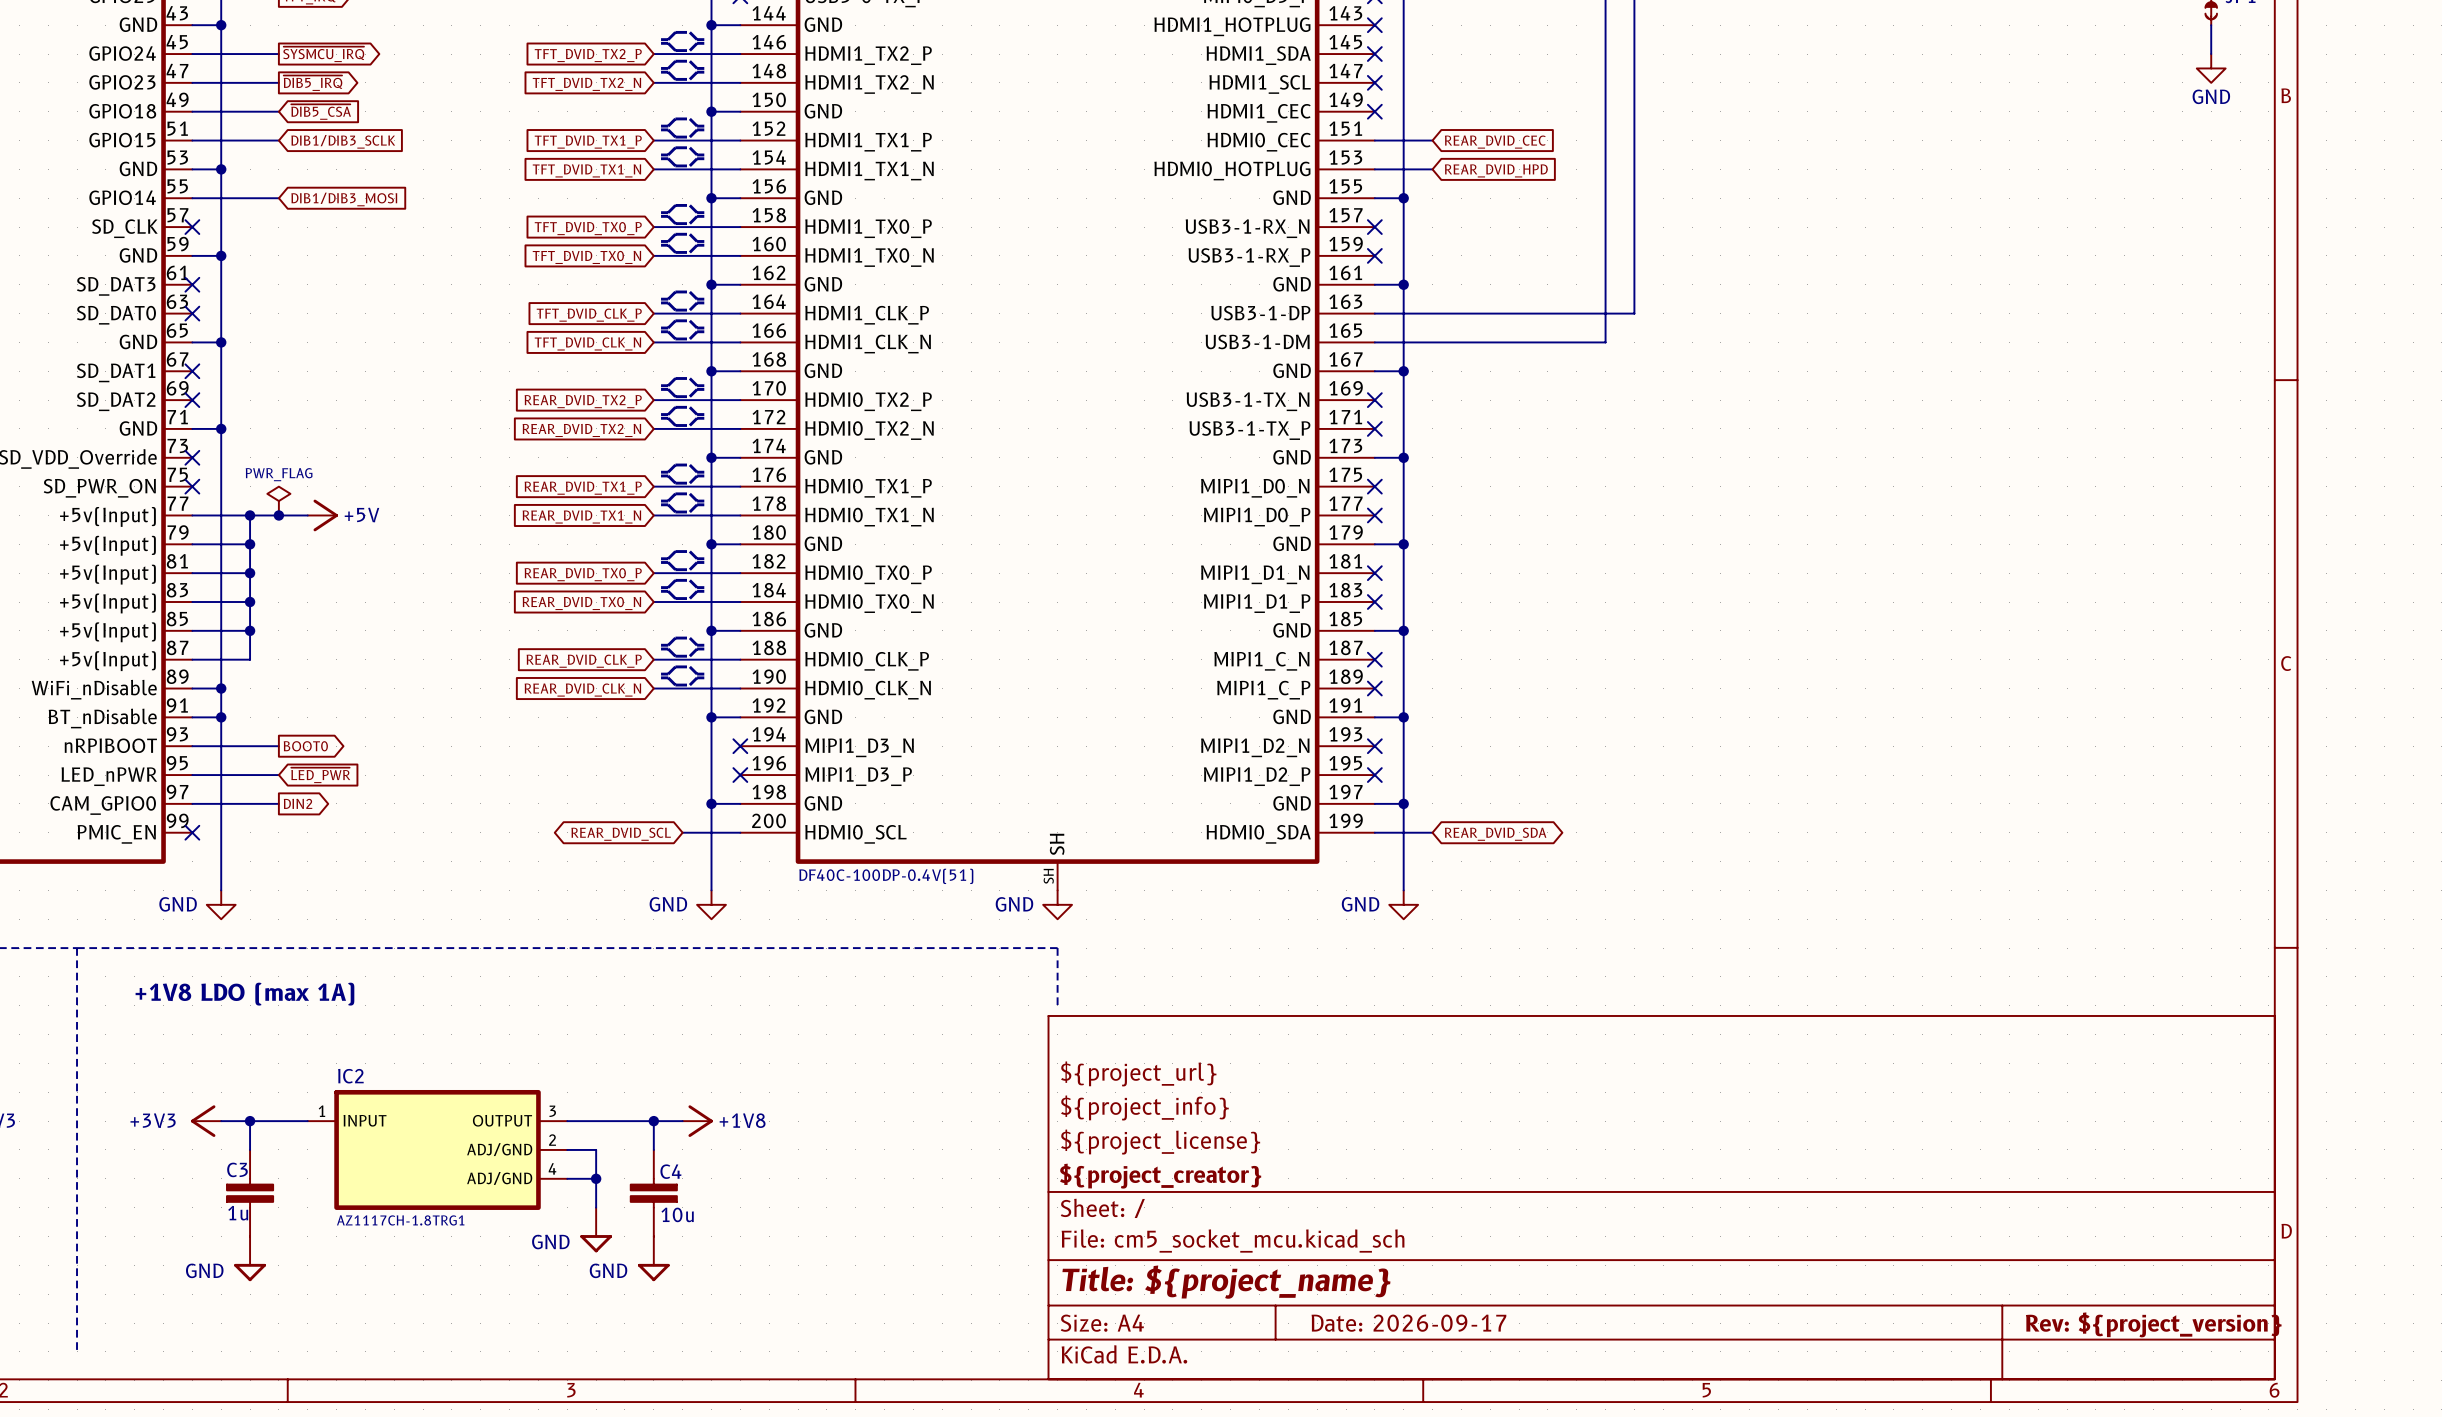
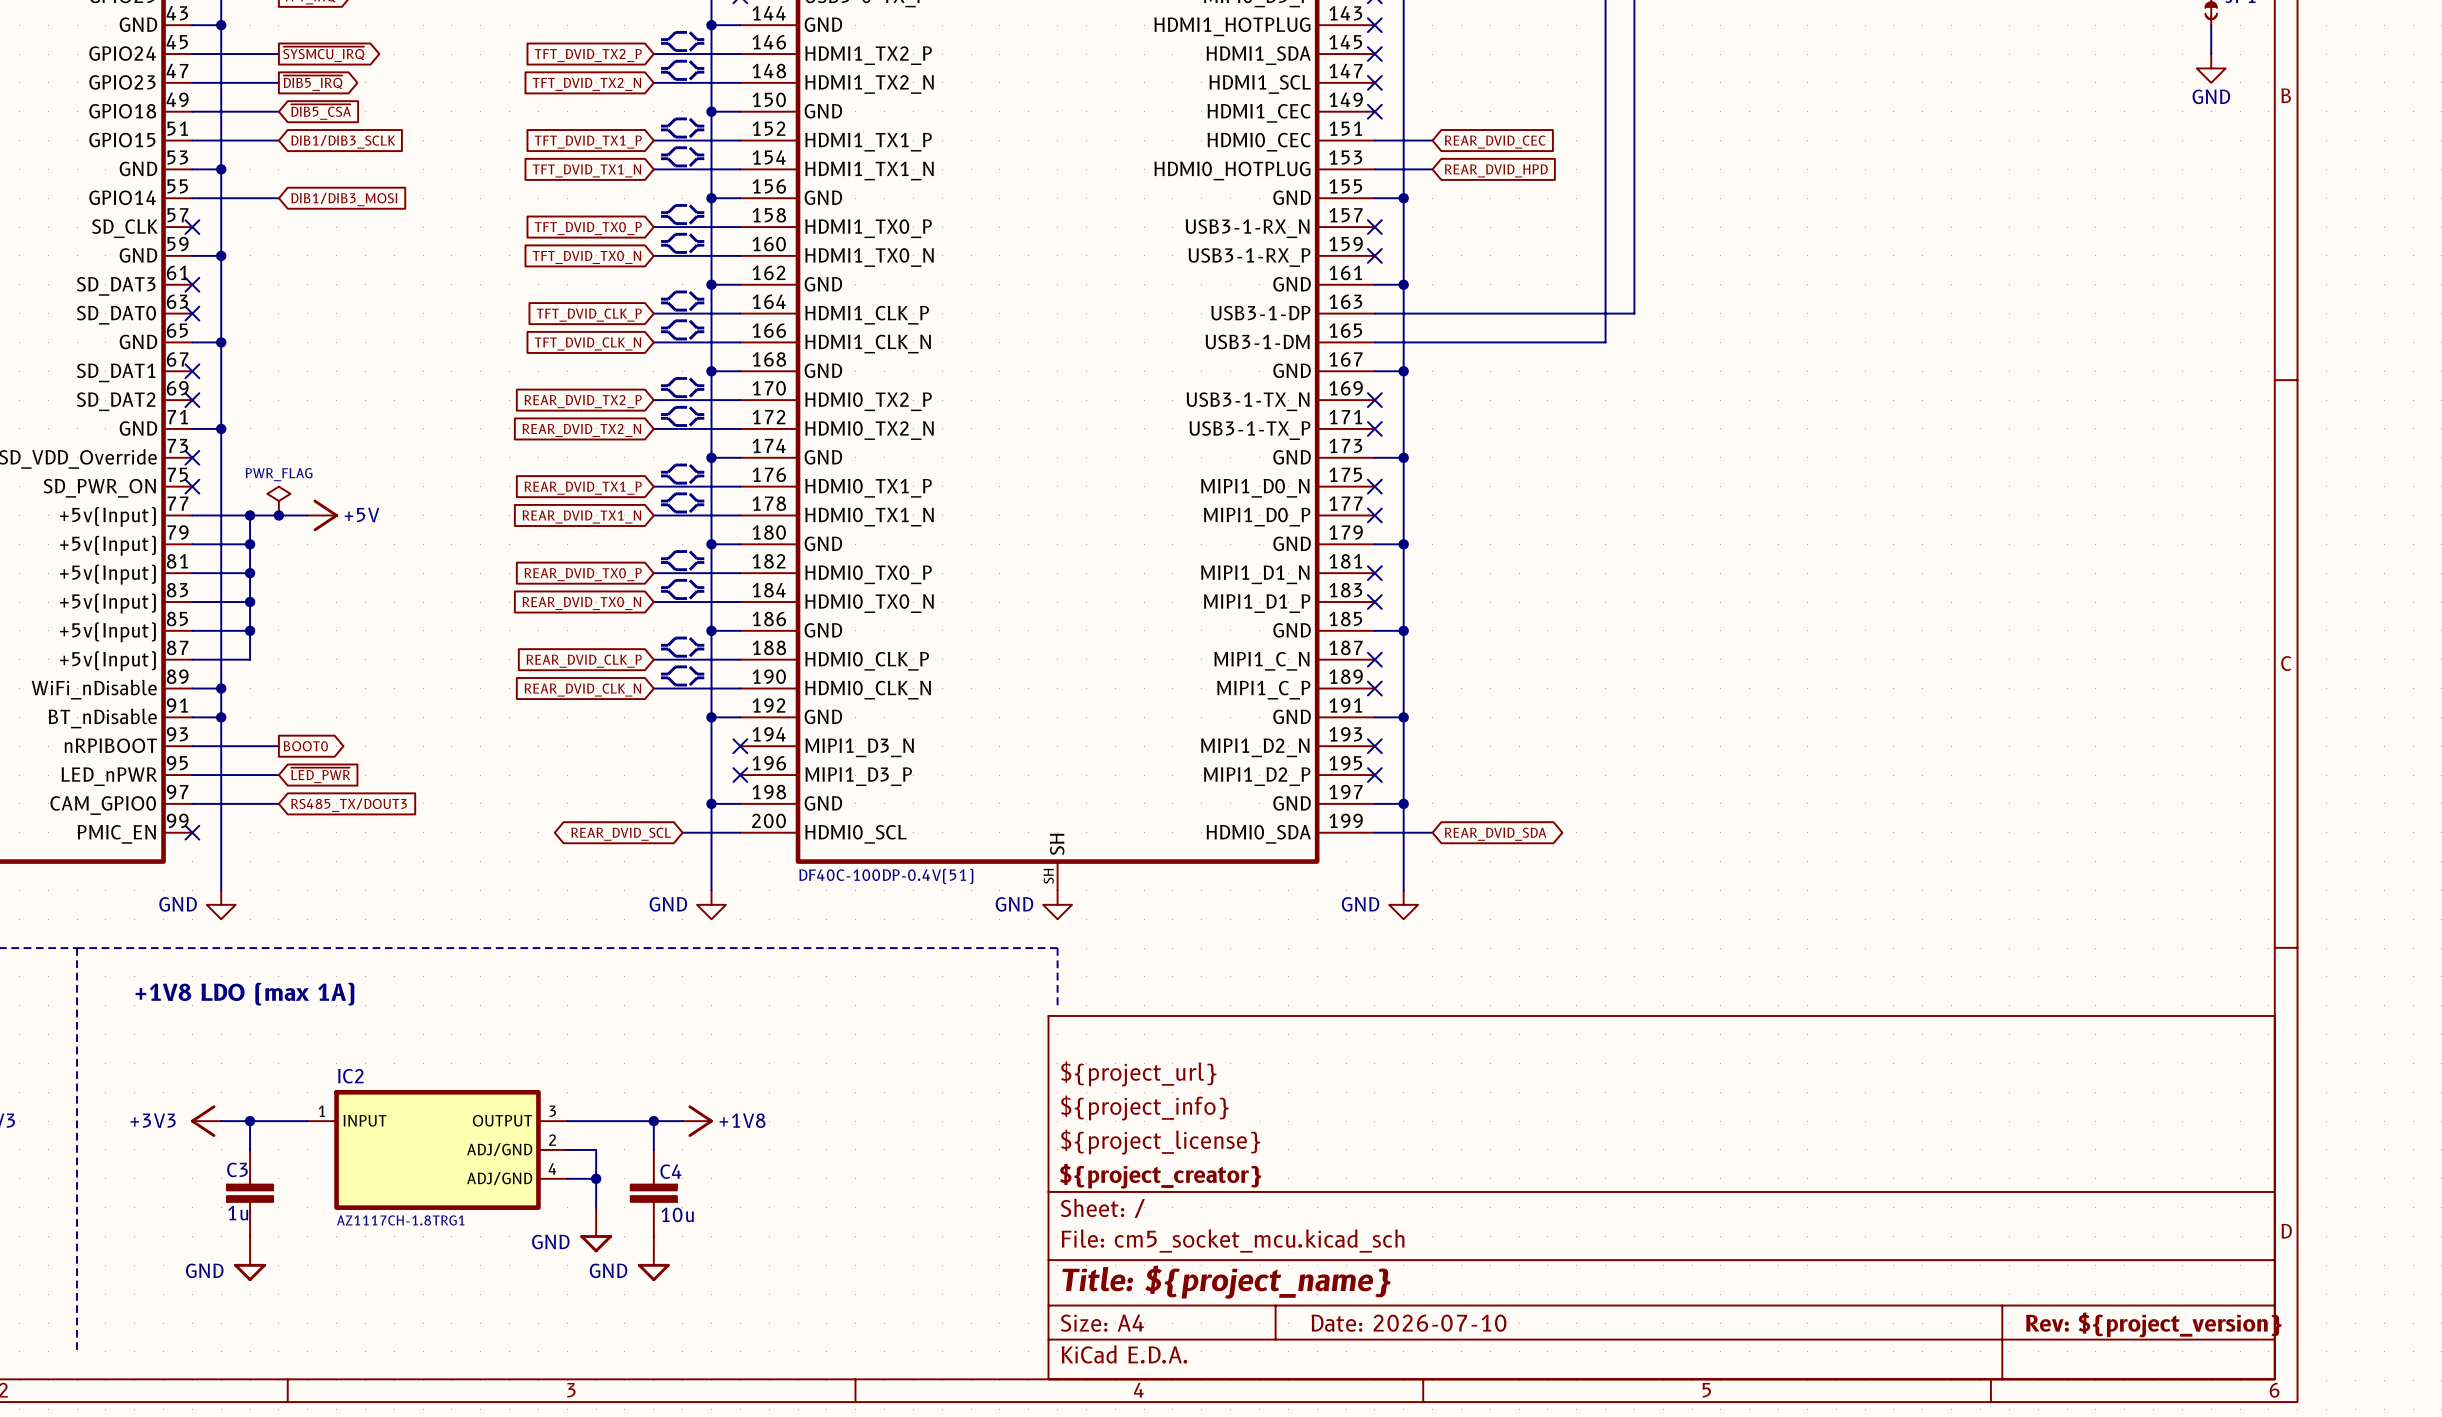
global label shape: output (298, 803) -> input (349, 805)
global label: DIN2 (298, 803) -> RS485_TX/DOUT3 (349, 805)
title block: Date: 2026-09-17 (1408, 1323) -> Date: 2026-07-10 (1409, 1323)

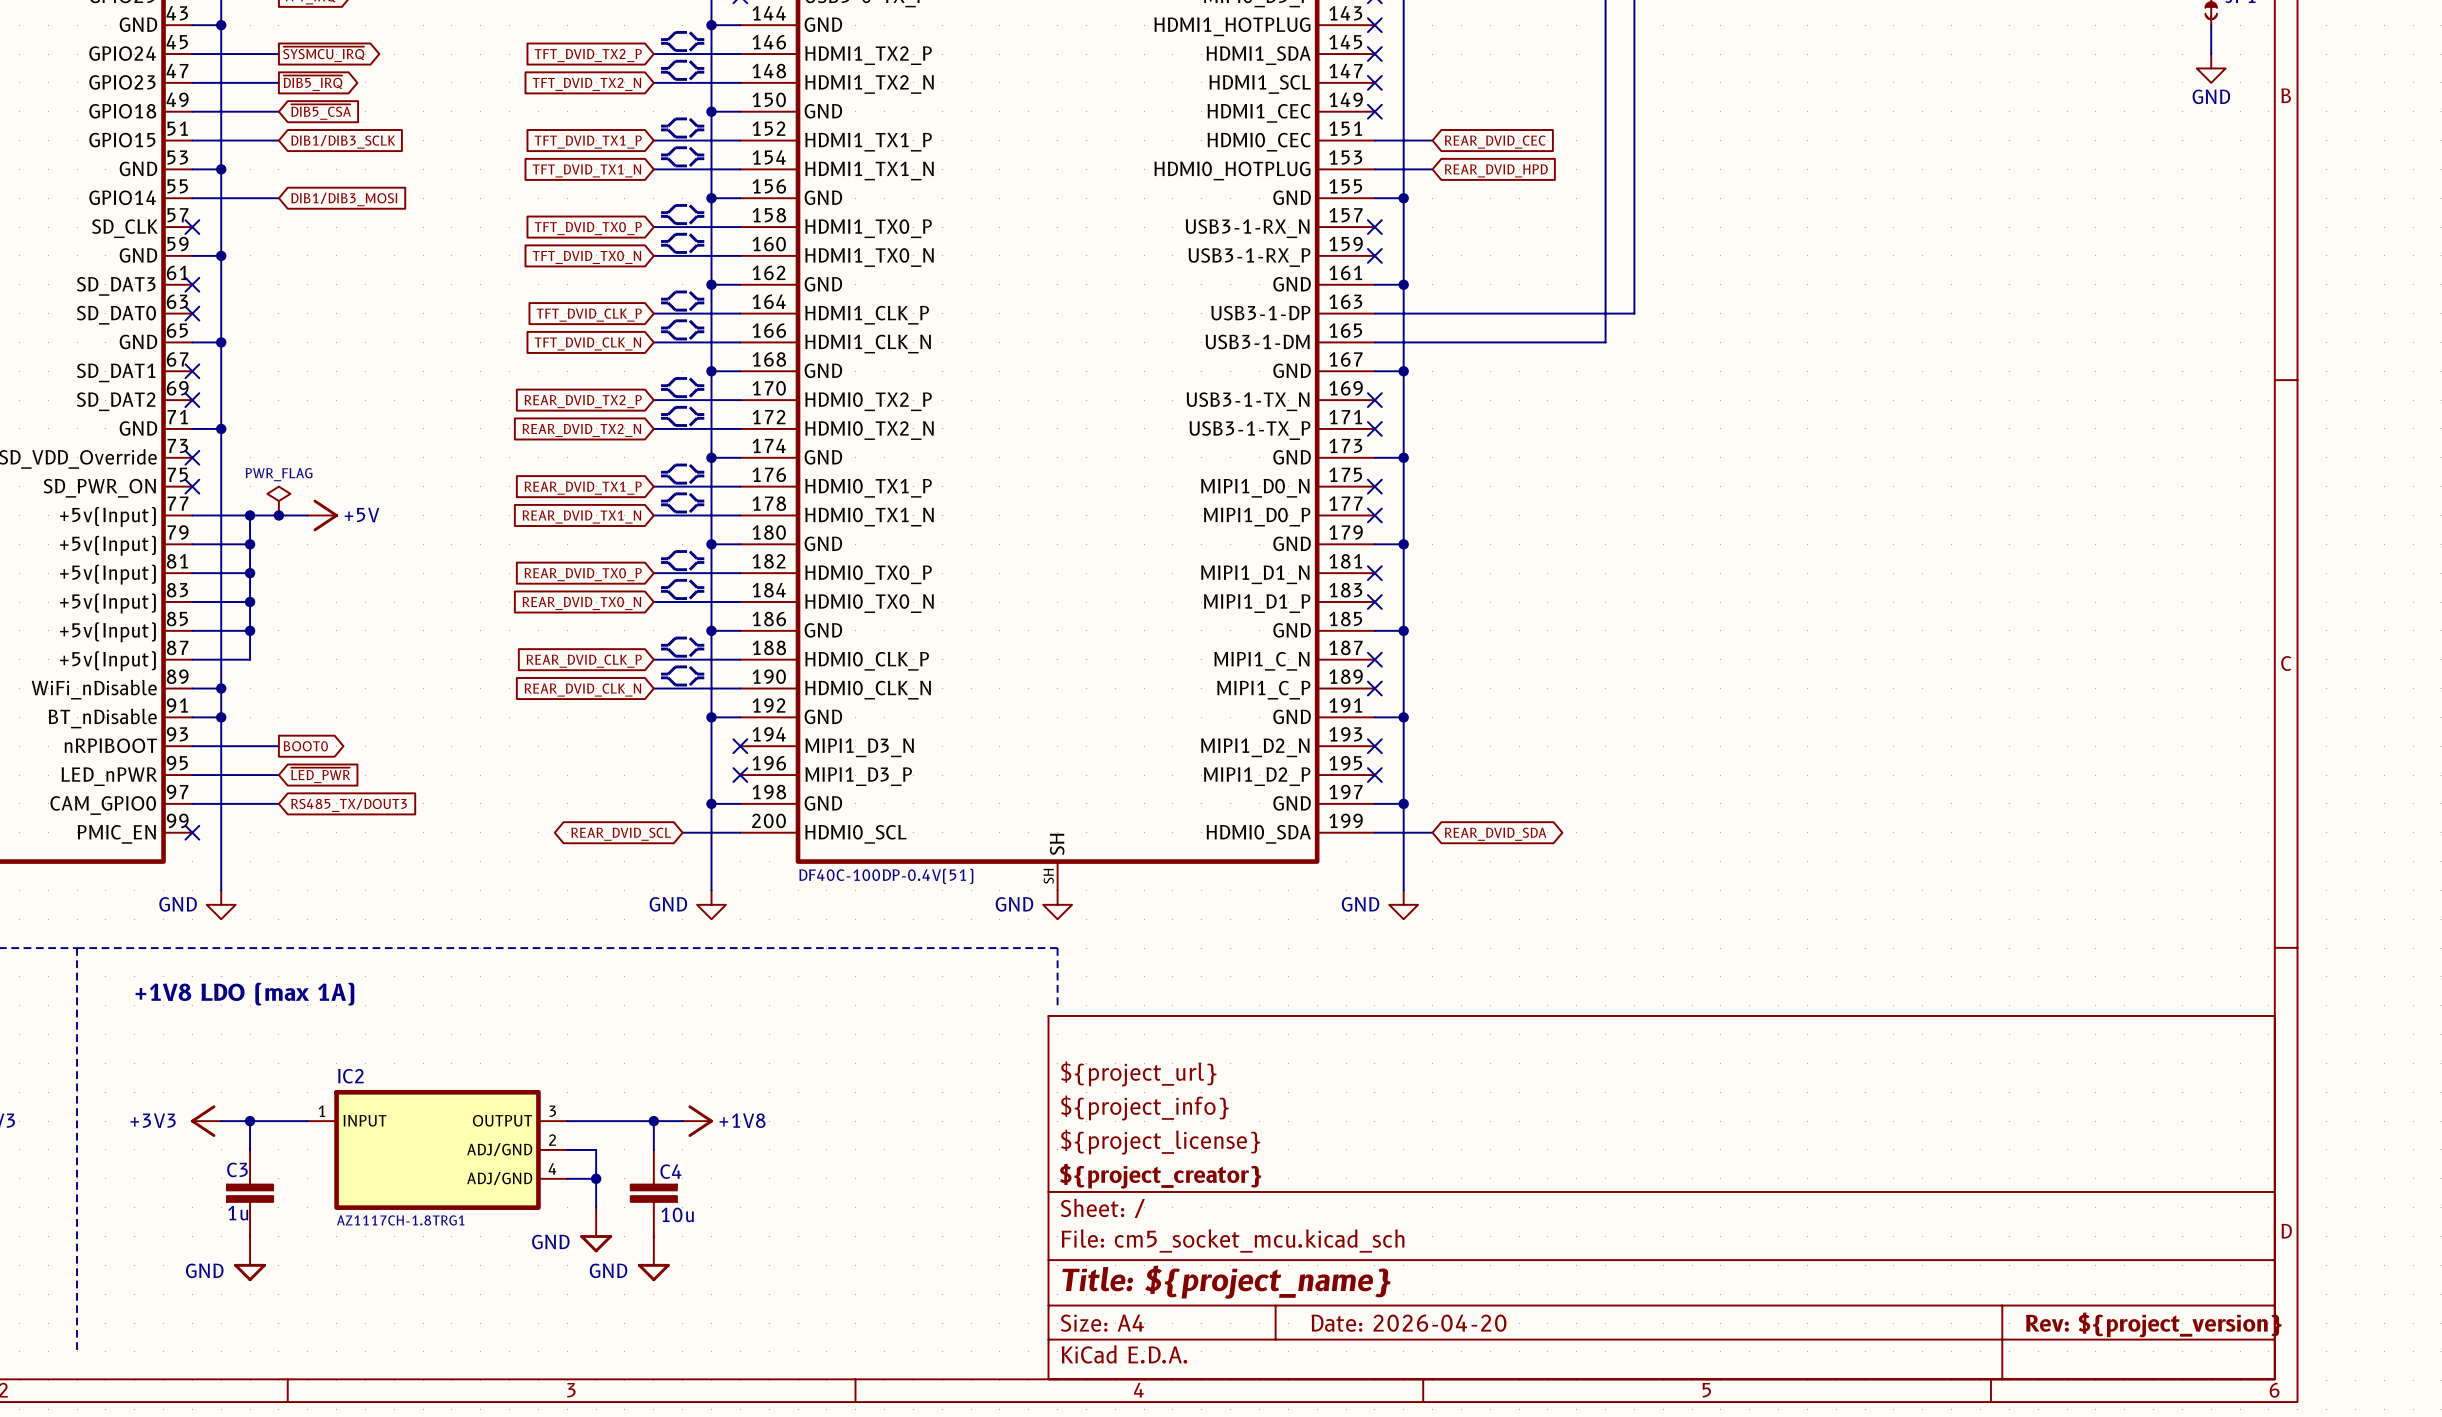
title block: Date: 2026-07-10 (1409, 1323) -> Date: 2026-04-20 (1409, 1323)

